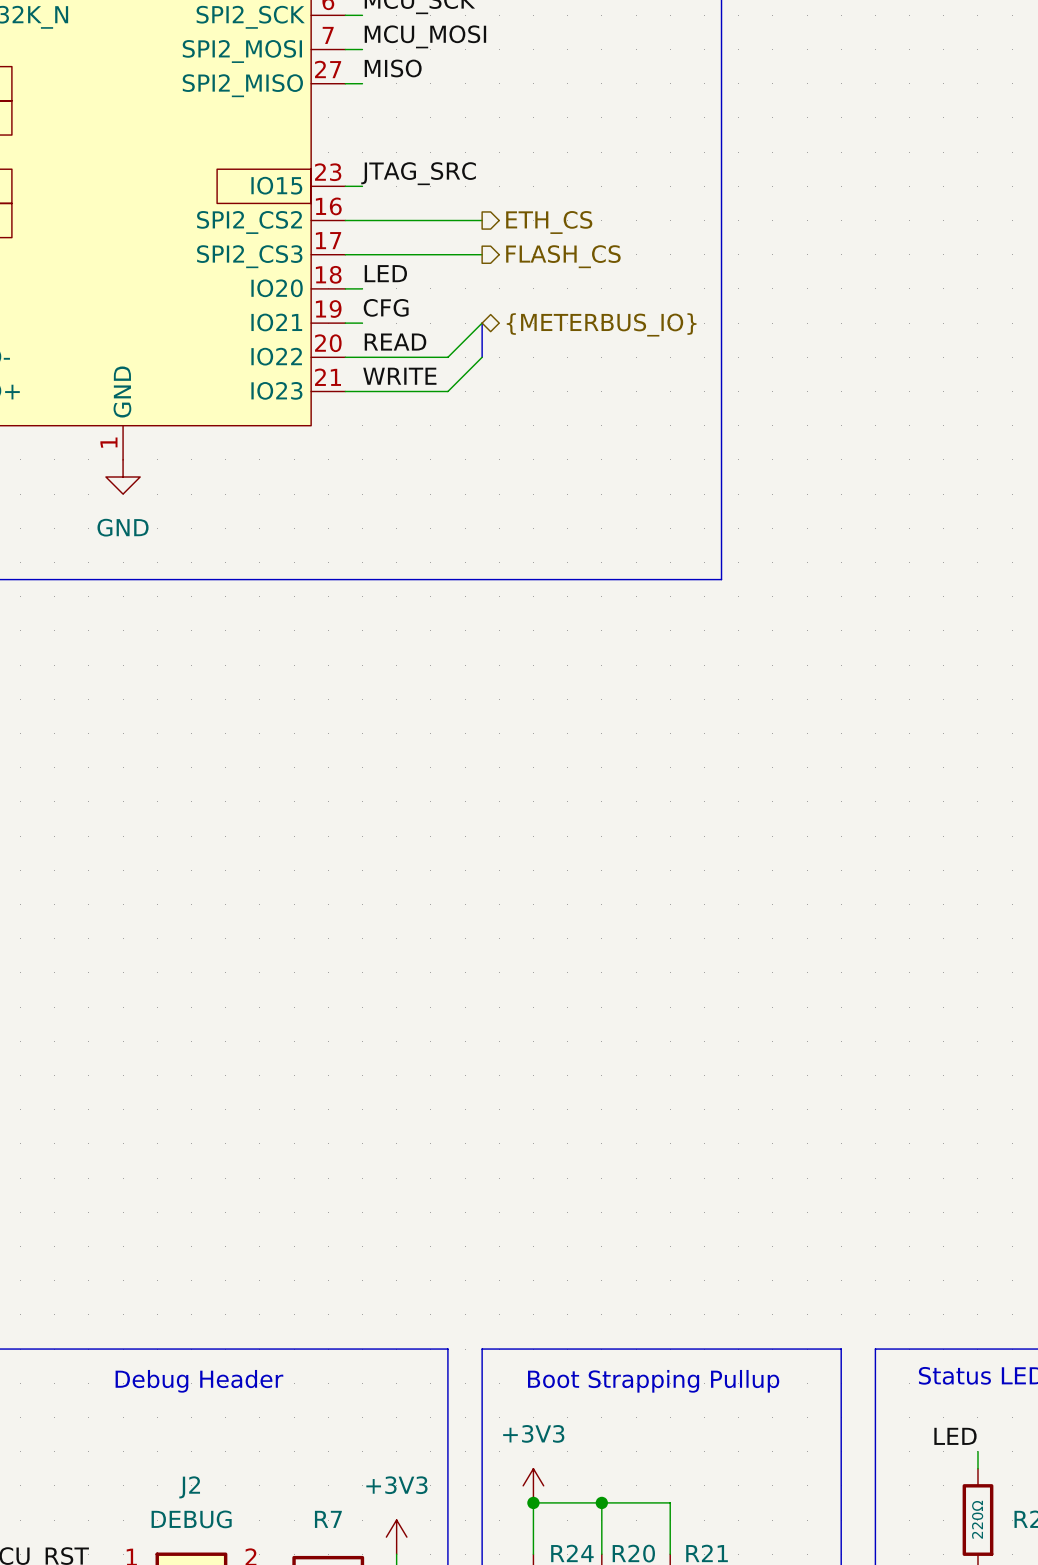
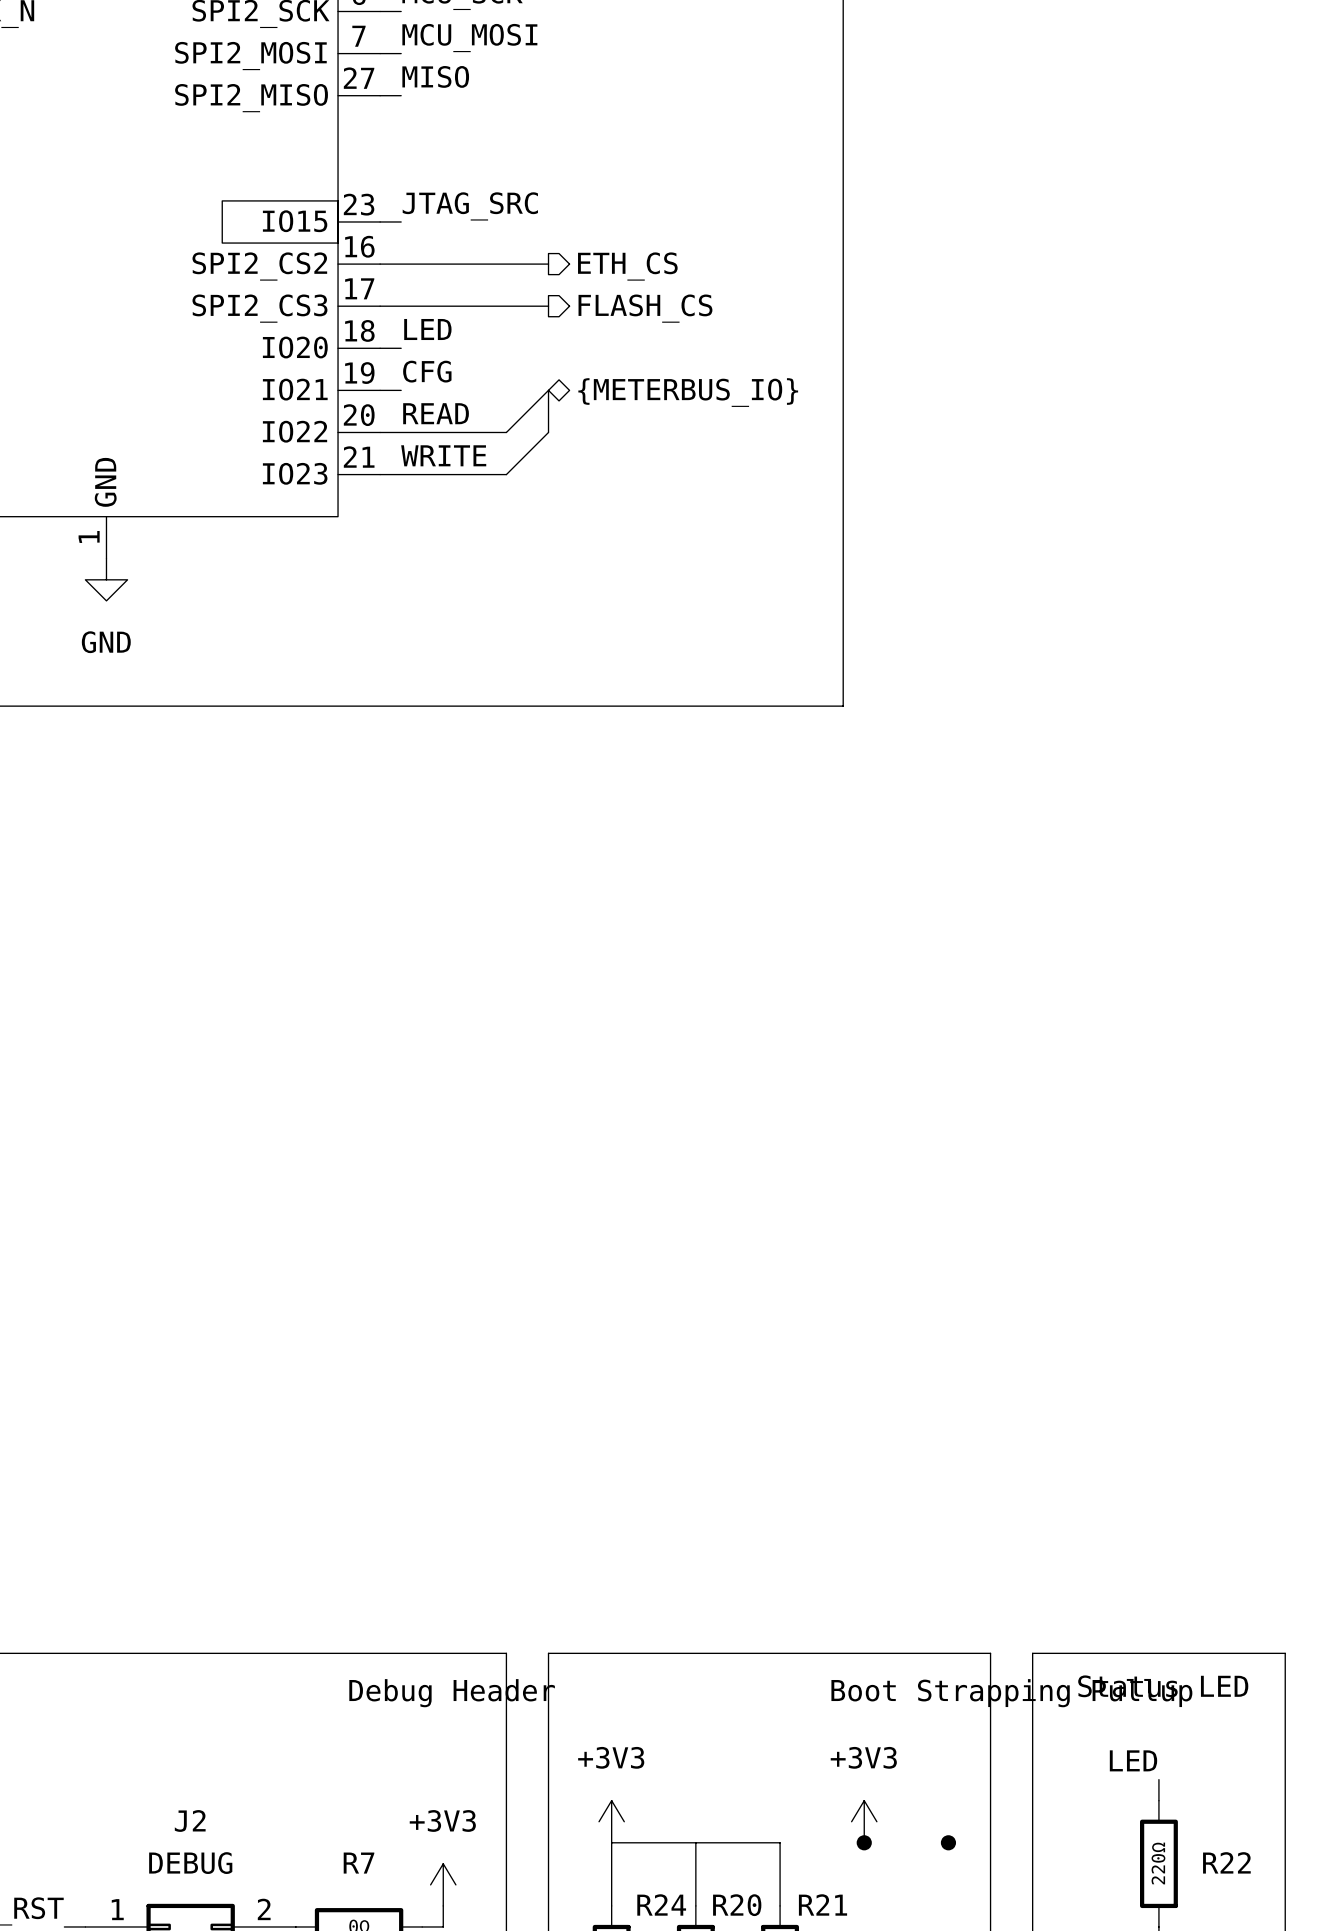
text position: Debug Header (199, 1381) -> Debug Header (452, 1693)
text position: Boot Strapping Pullup (653, 1381) -> Boot Strapping Pullup (1011, 1693)
power symbol: none -> +3V3 (864, 1821)
junction: (533, 1502) -> none
junction: (601, 1502) -> none
junction: none -> (864, 1842)
junction: none -> (948, 1842)

